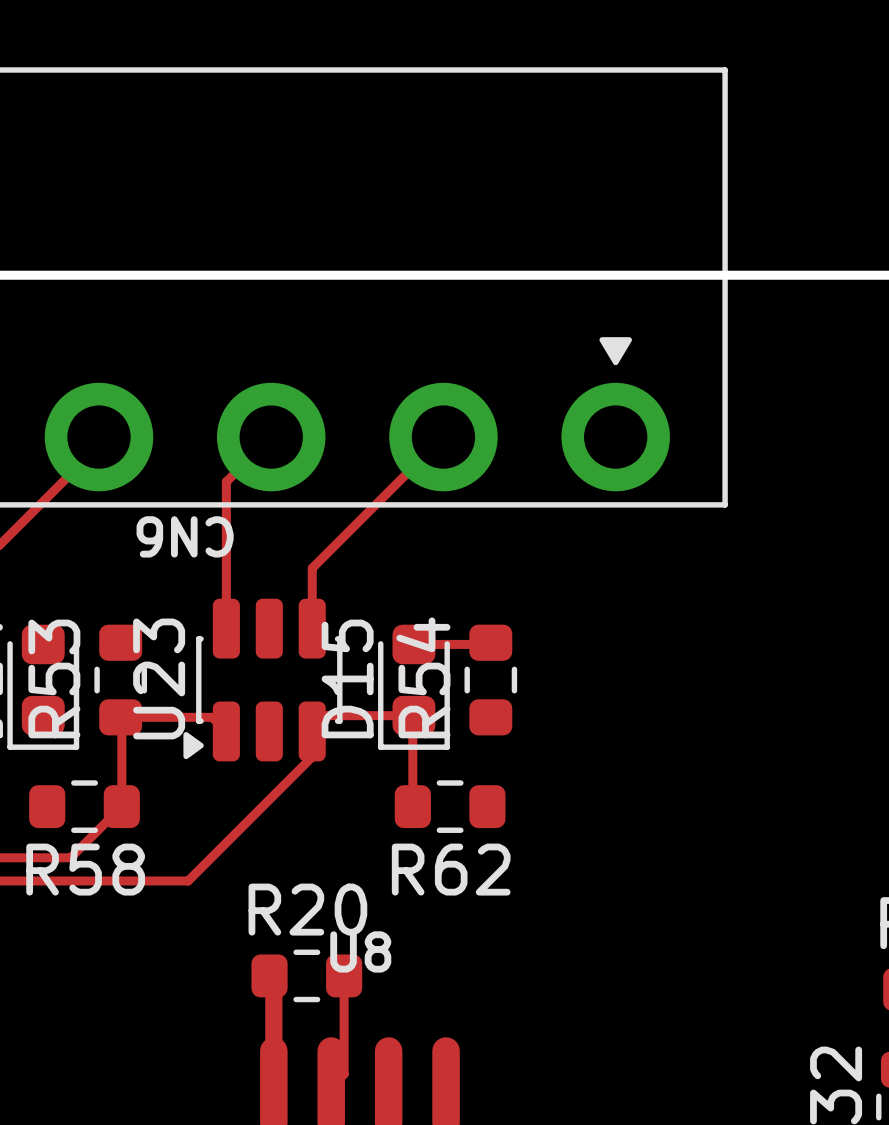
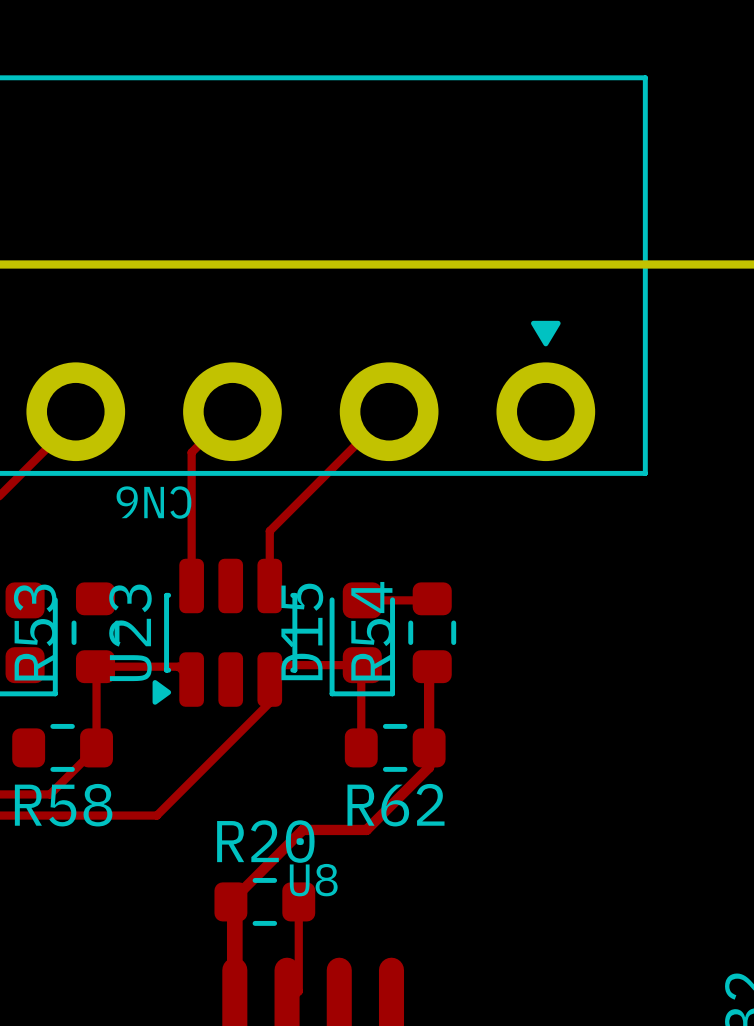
track: none -> (432, 666) (429, 669) (429, 767) (366, 829) (302, 829) (230, 901)

